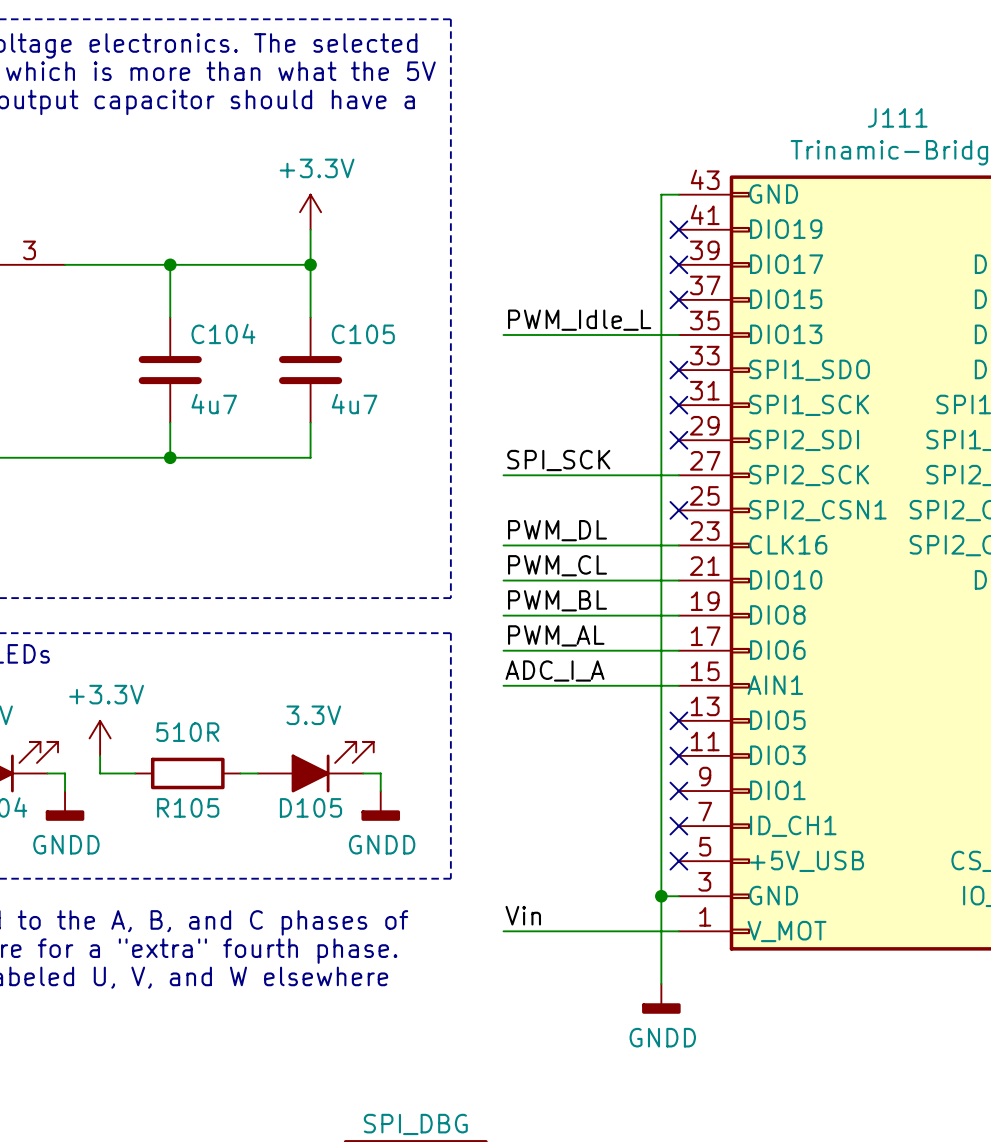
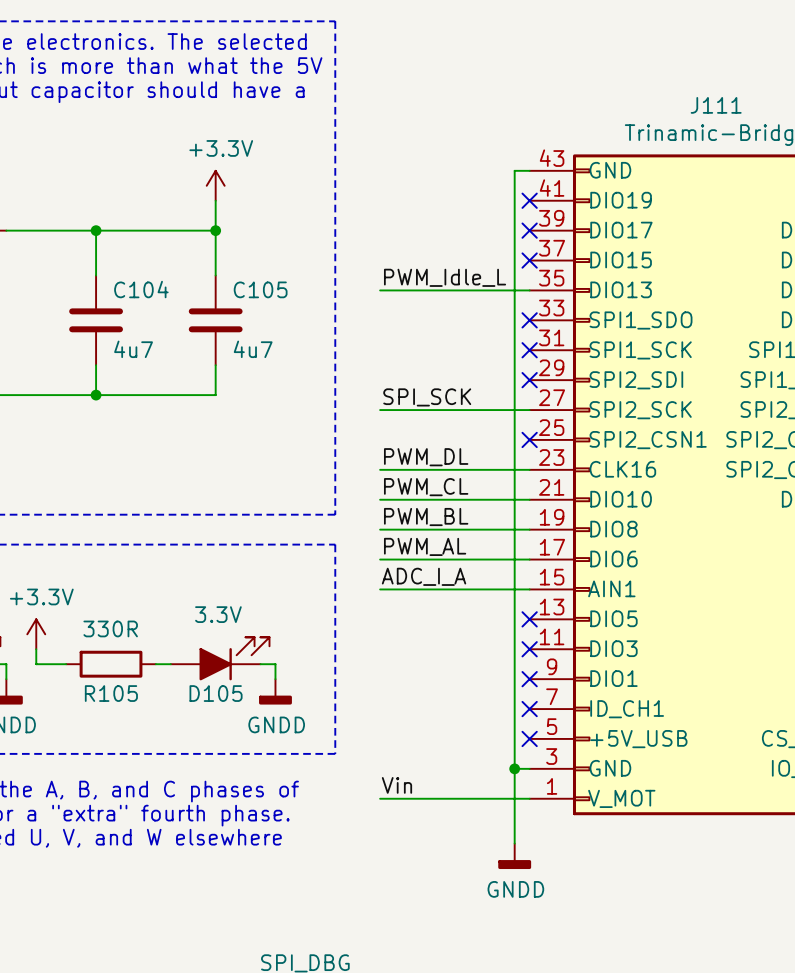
R105 value: 510R (187, 732) -> 330R (110, 628)

